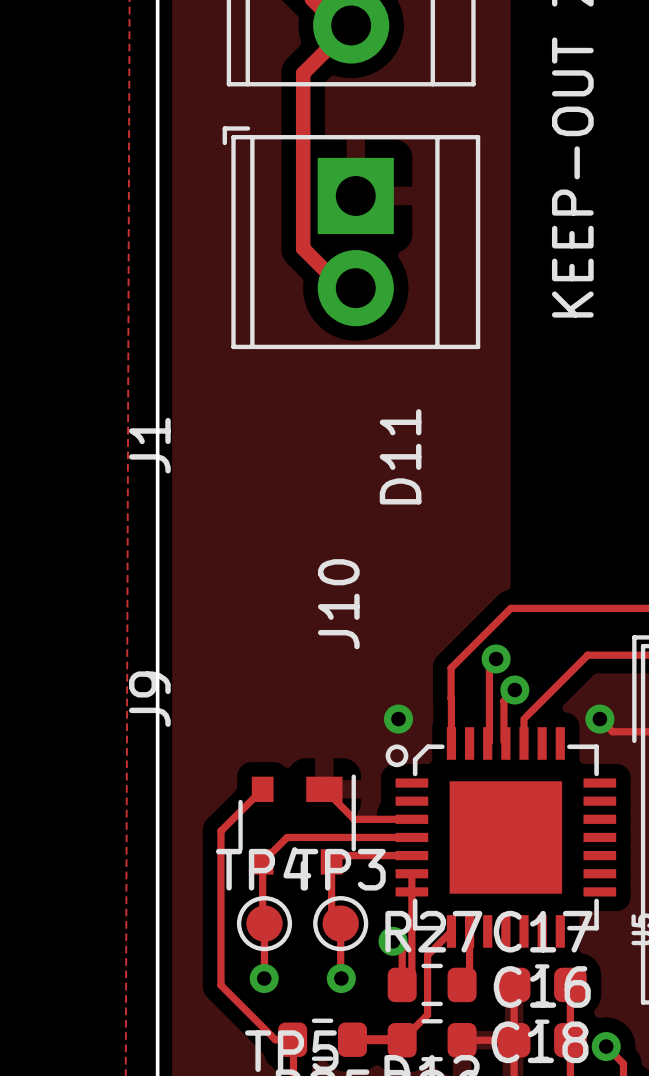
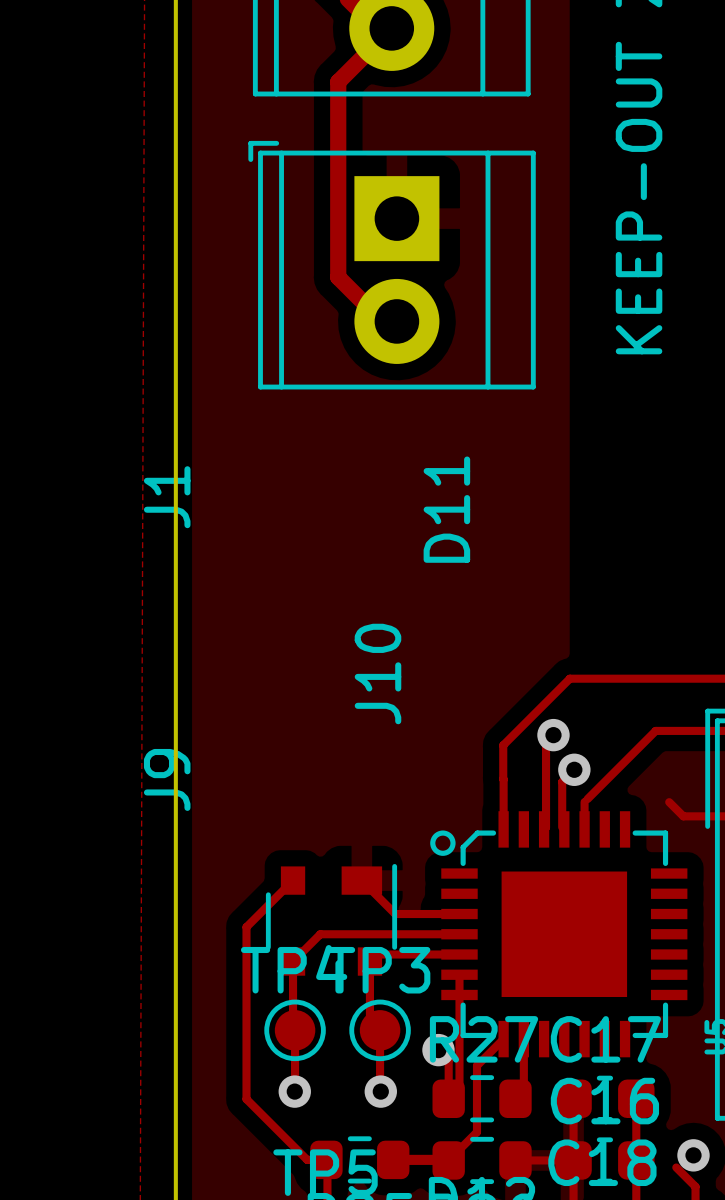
via: (398, 719) -> none
via: (599, 719) -> none
via position: (606, 1046) -> (693, 1155)

